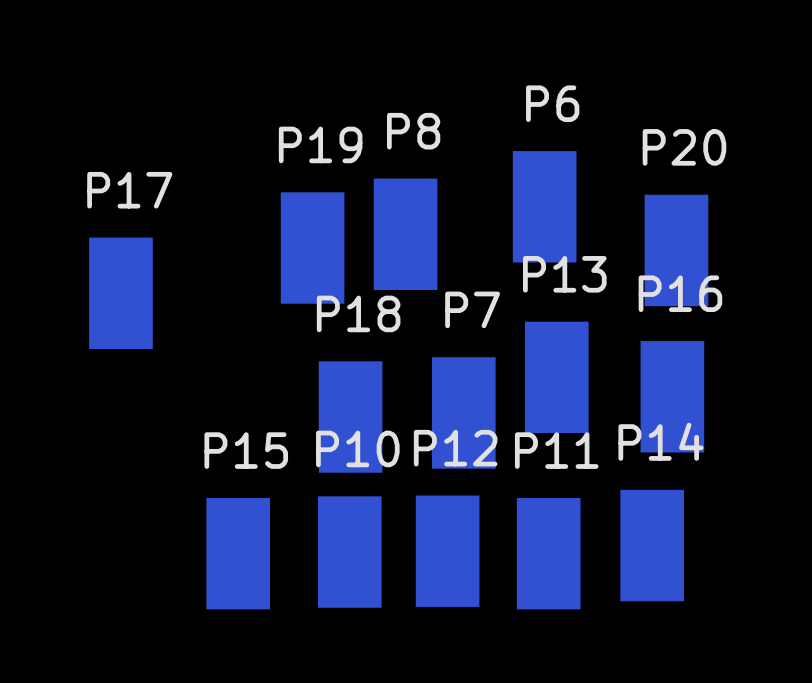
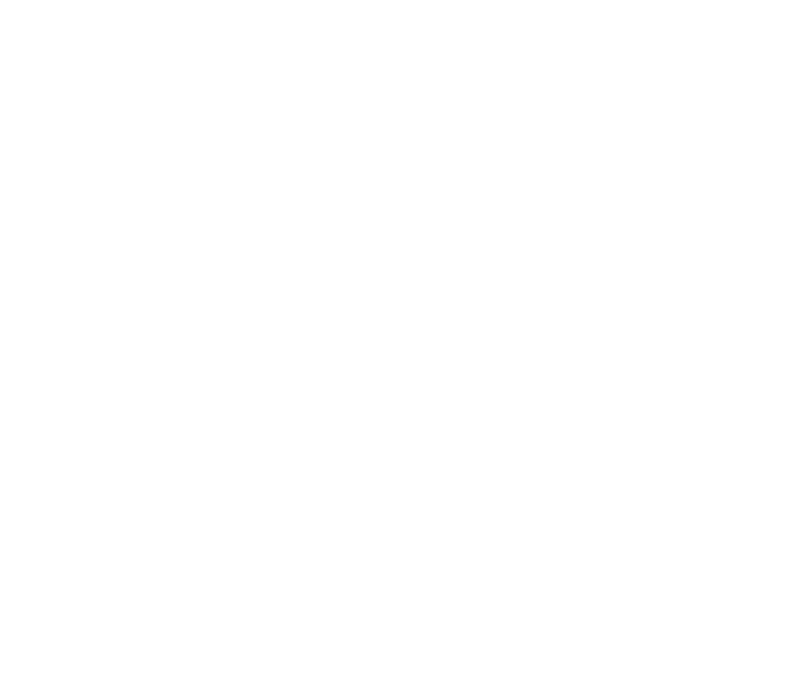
P6: (544, 206) -> none
P8: (405, 234) -> none
P19: (312, 248) -> none
P20: (676, 250) -> none
P17: (120, 293) -> none
P13: (556, 377) -> none
P16: (672, 396) -> none
P7: (463, 412) -> none
P18: (350, 417) -> none
P14: (652, 545) -> none
P12: (447, 551) -> none
P10: (349, 552) -> none
P15: (238, 553) -> none
P11: (548, 553) -> none

